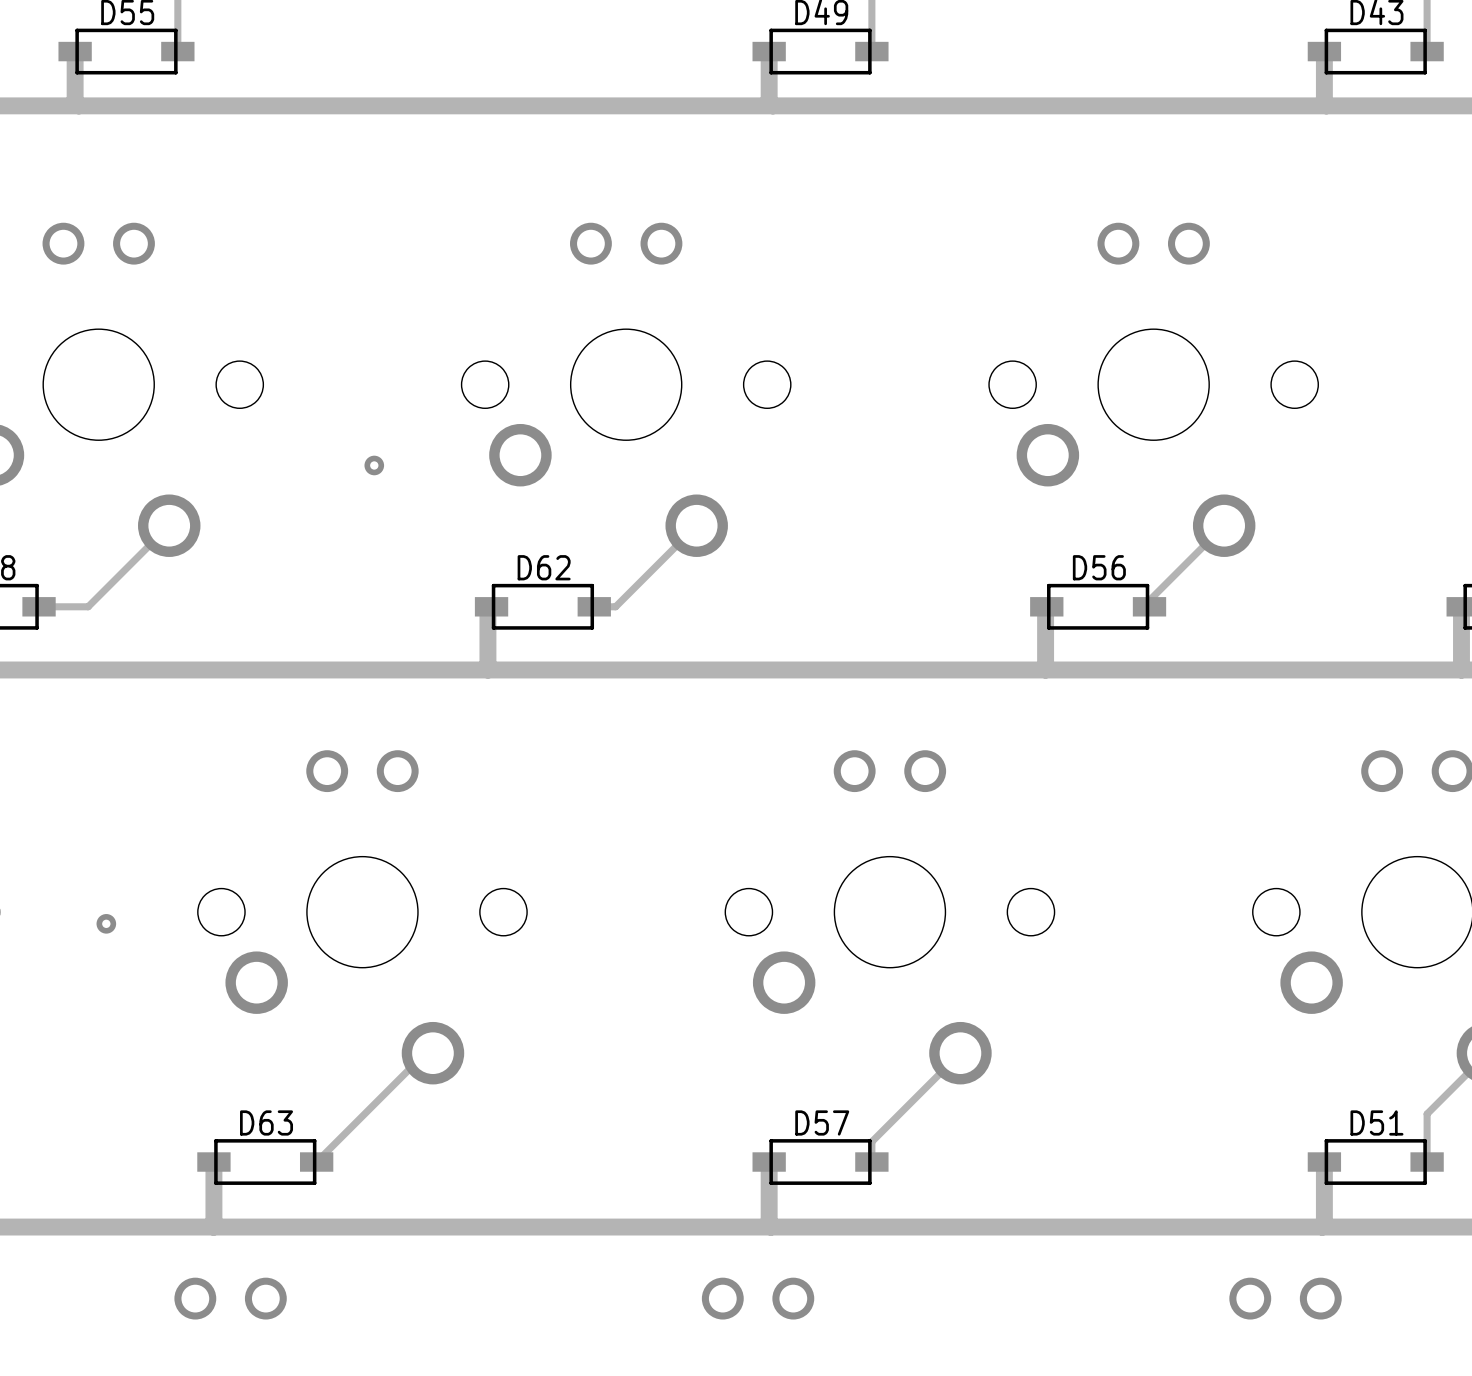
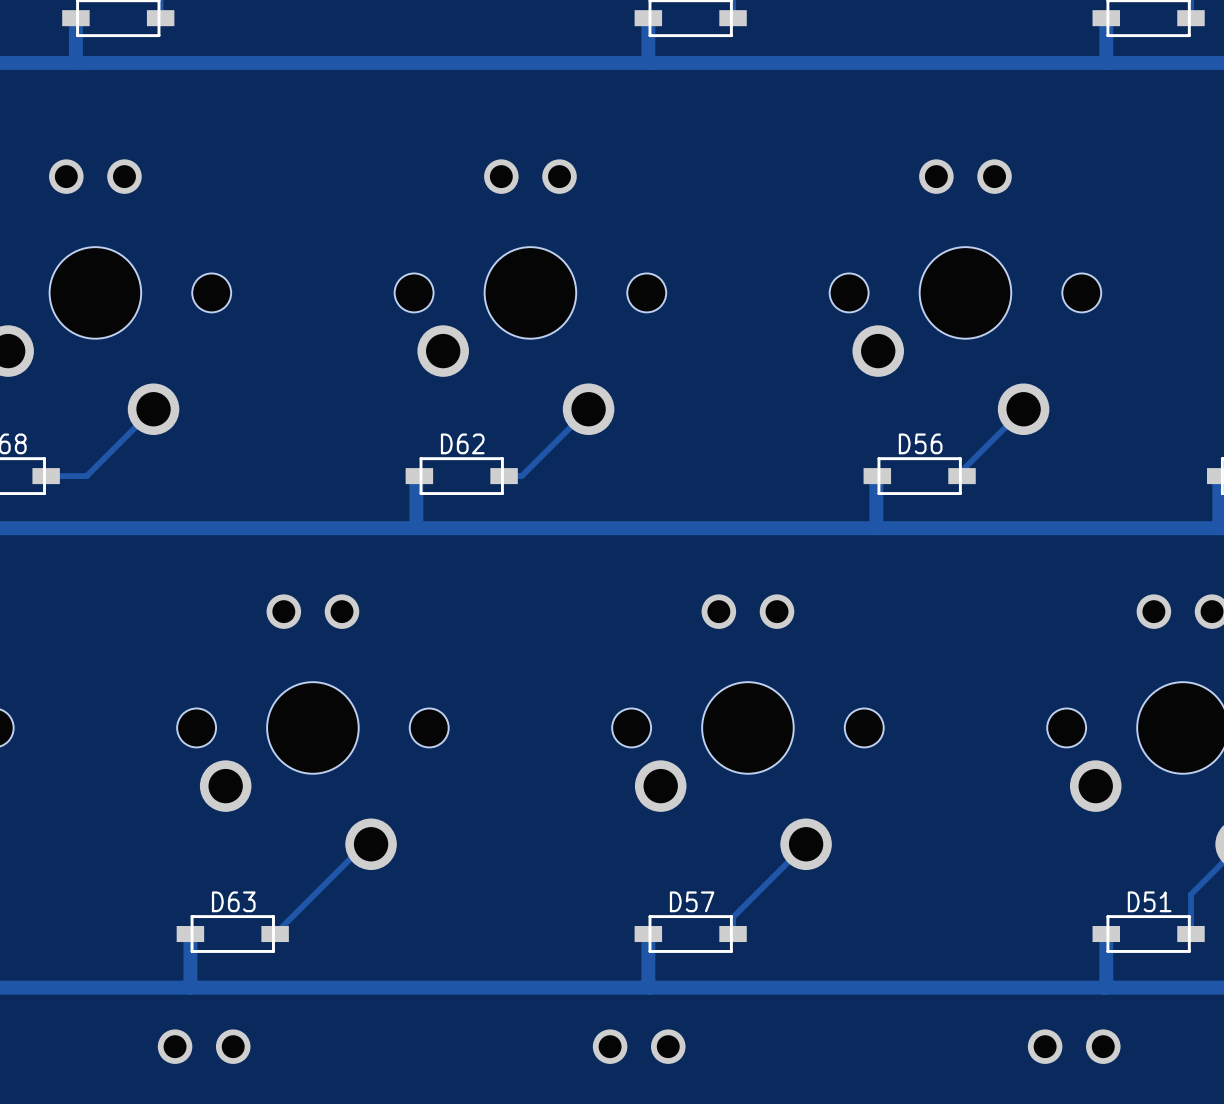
via: (374, 465) -> none
via: (106, 923) -> none

